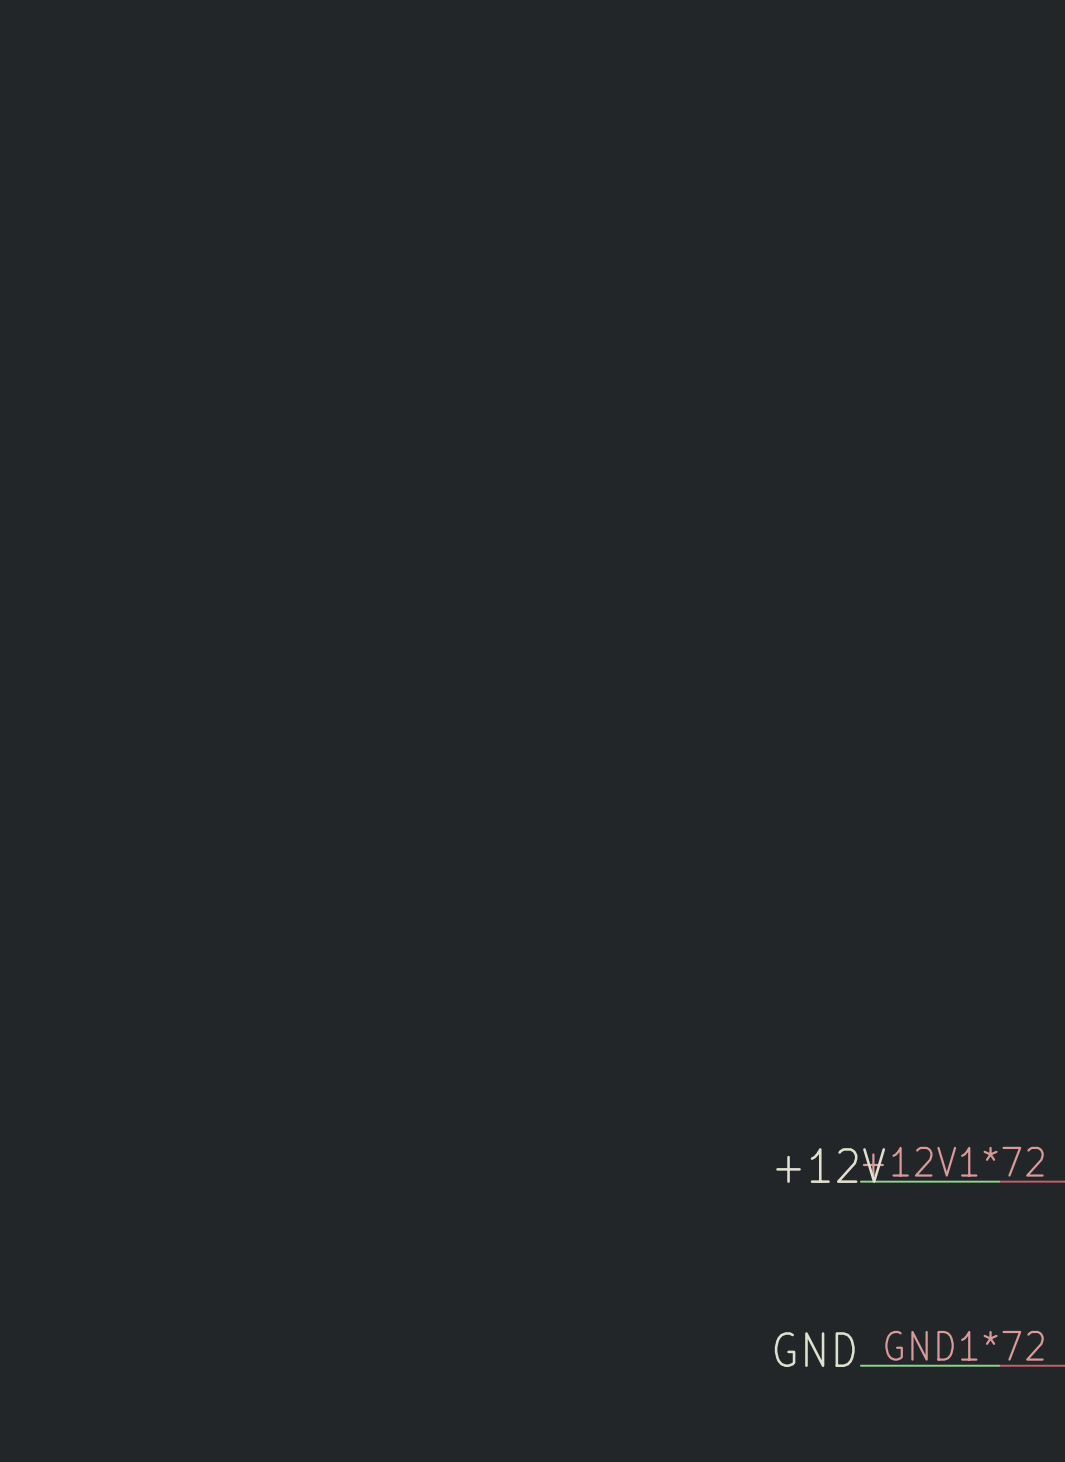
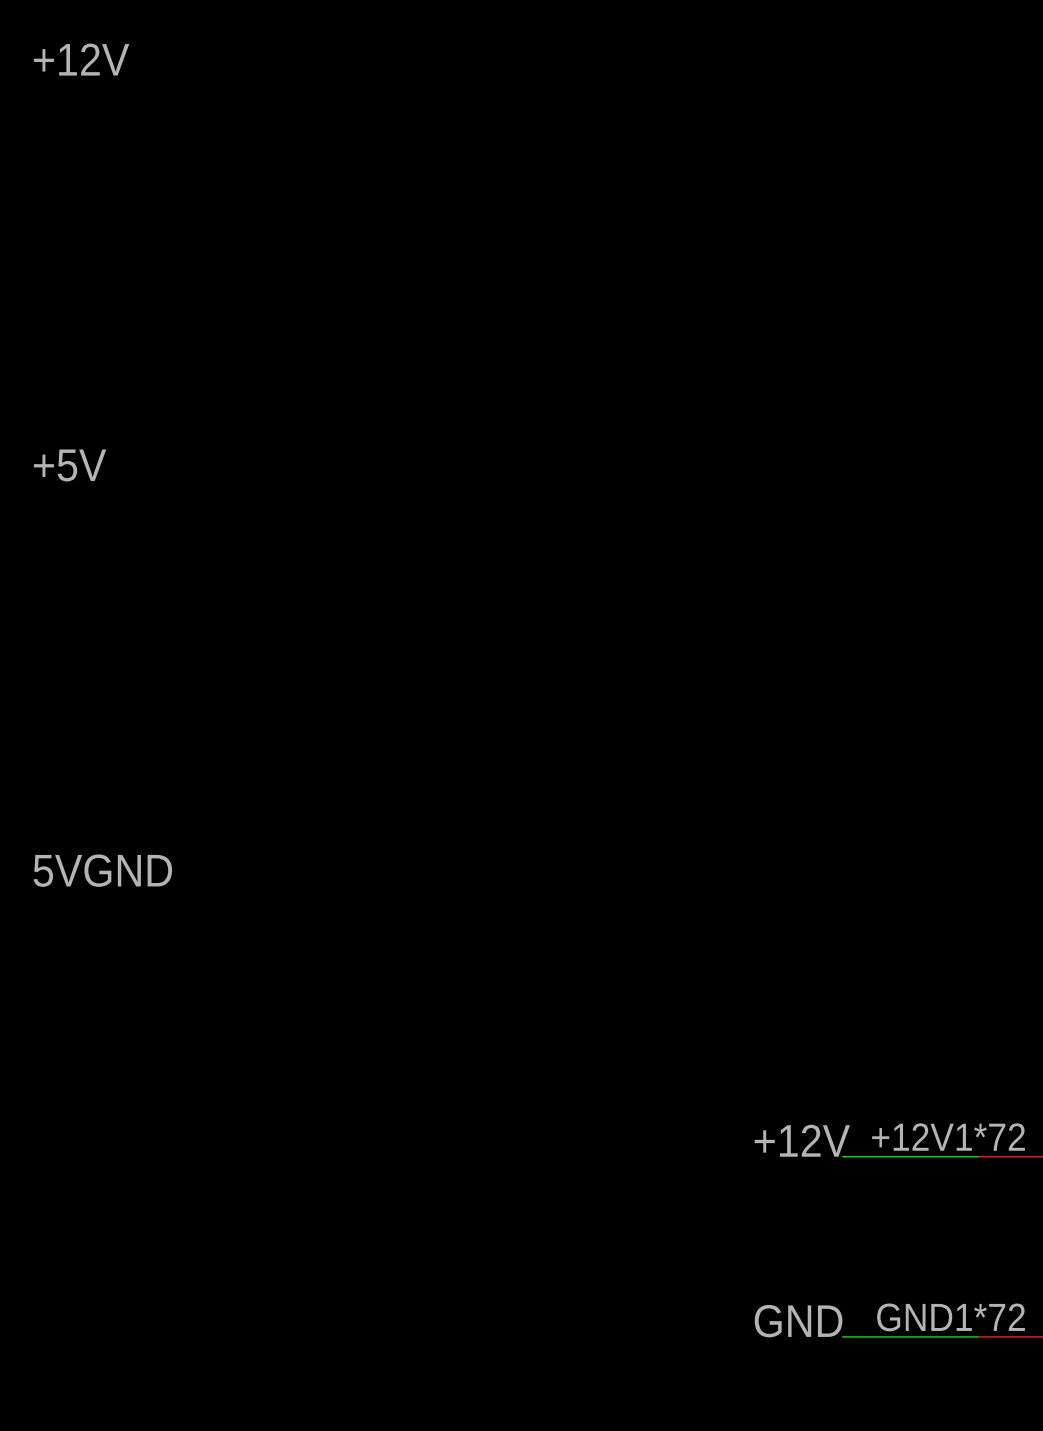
label: none -> +12V (81, 59)
label: none -> +5V (70, 465)
label: none -> 5VGND (102, 870)

